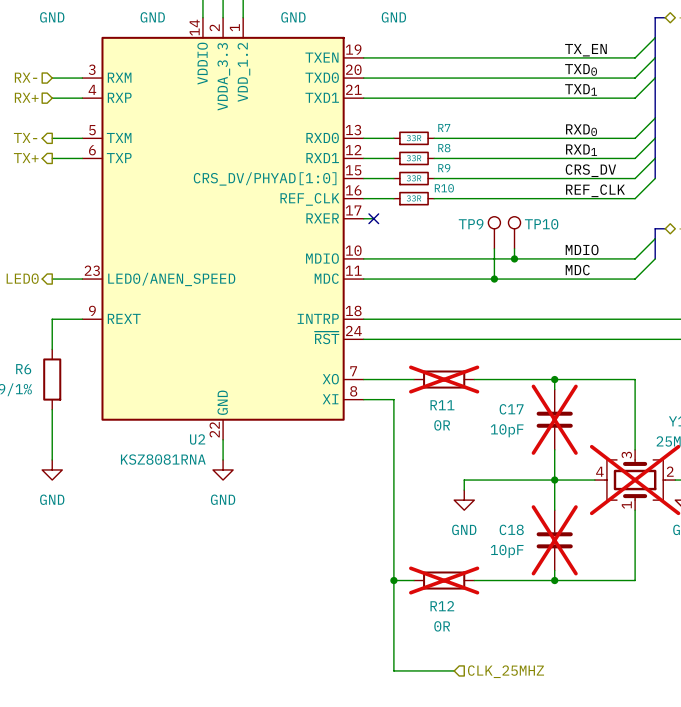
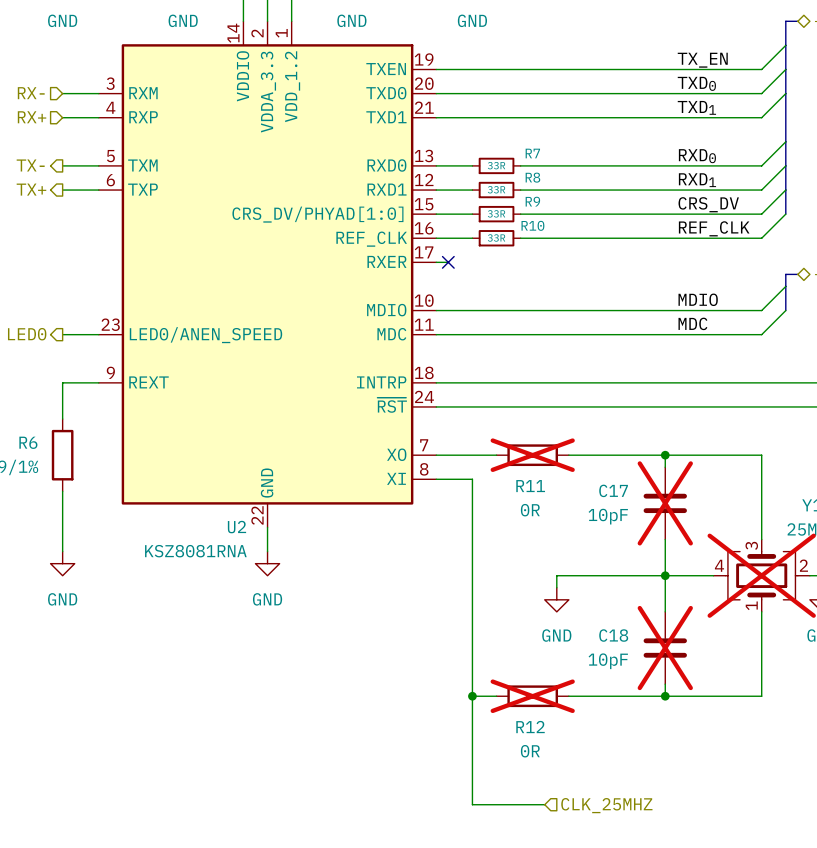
TP9: (494, 232) -> none
TP10: (514, 232) -> none
wire: (494, 248) (494, 279) -> none
wire: (514, 248) (514, 258) -> none
junction: (514, 258) -> none
junction: (494, 279) -> none

